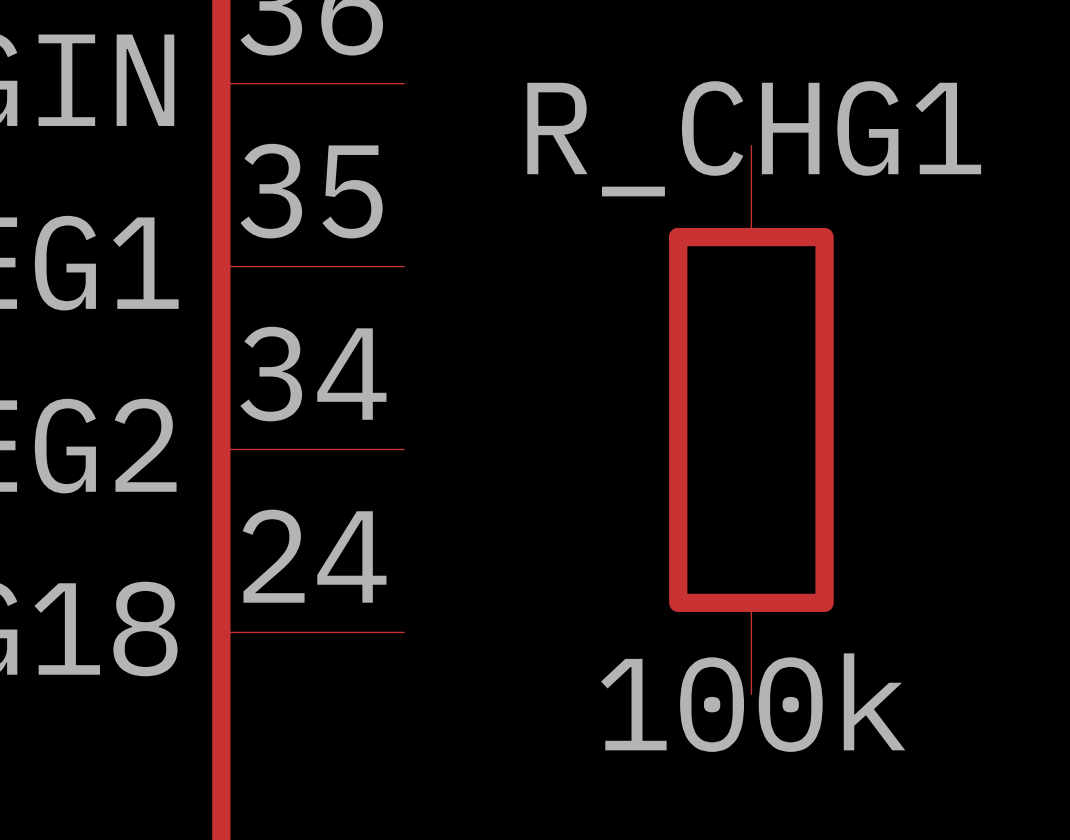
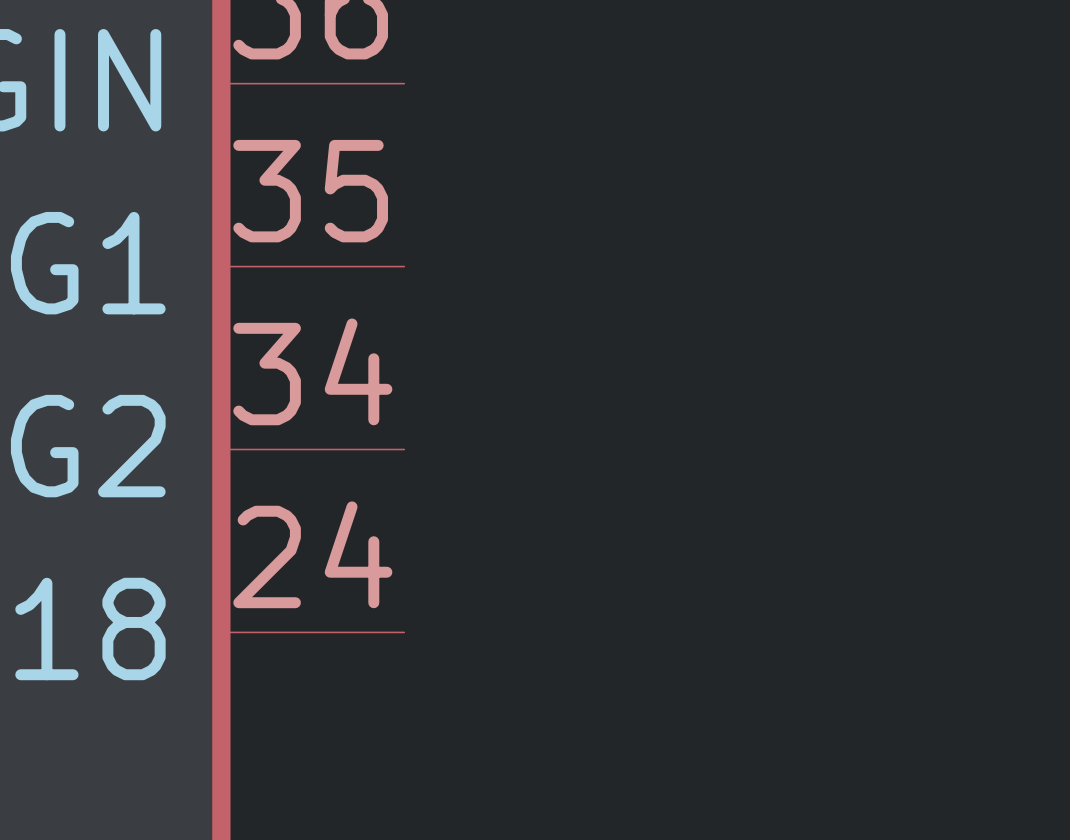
R_CHG1: 100k (751, 419) -> none

